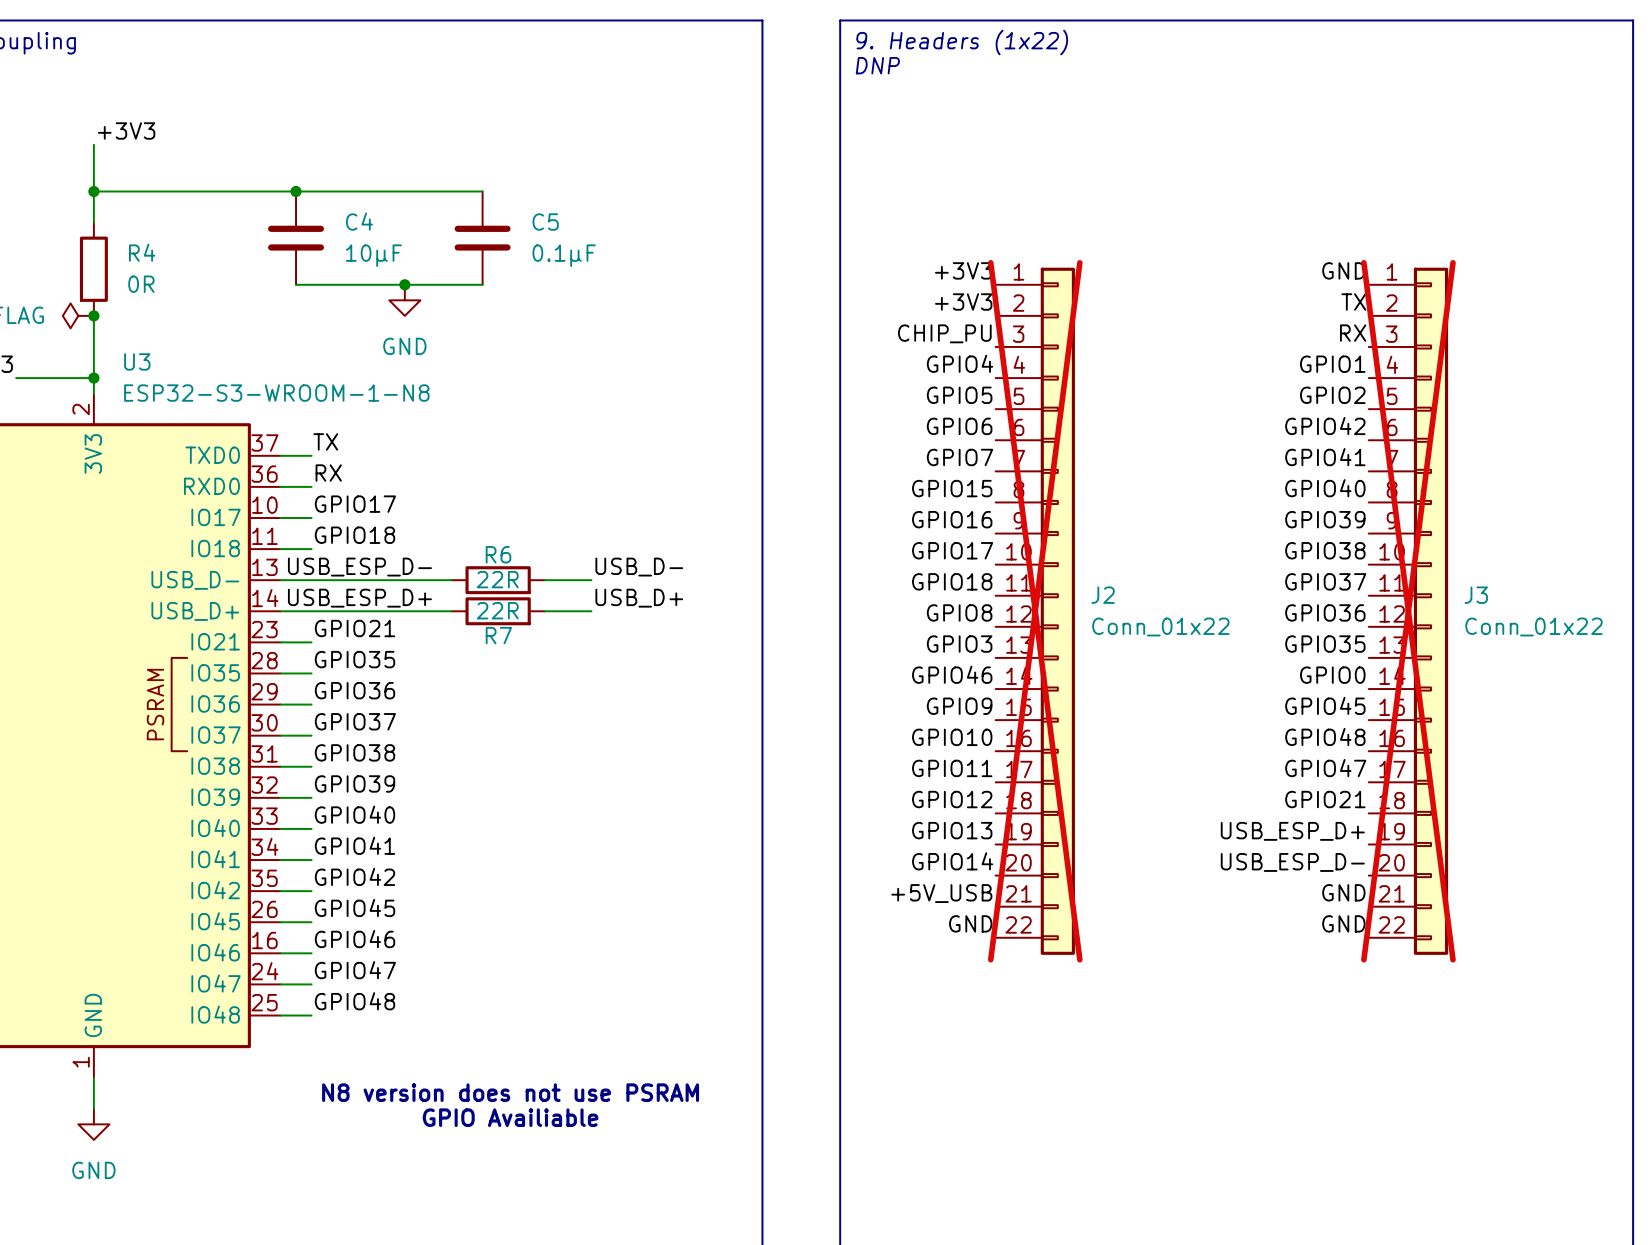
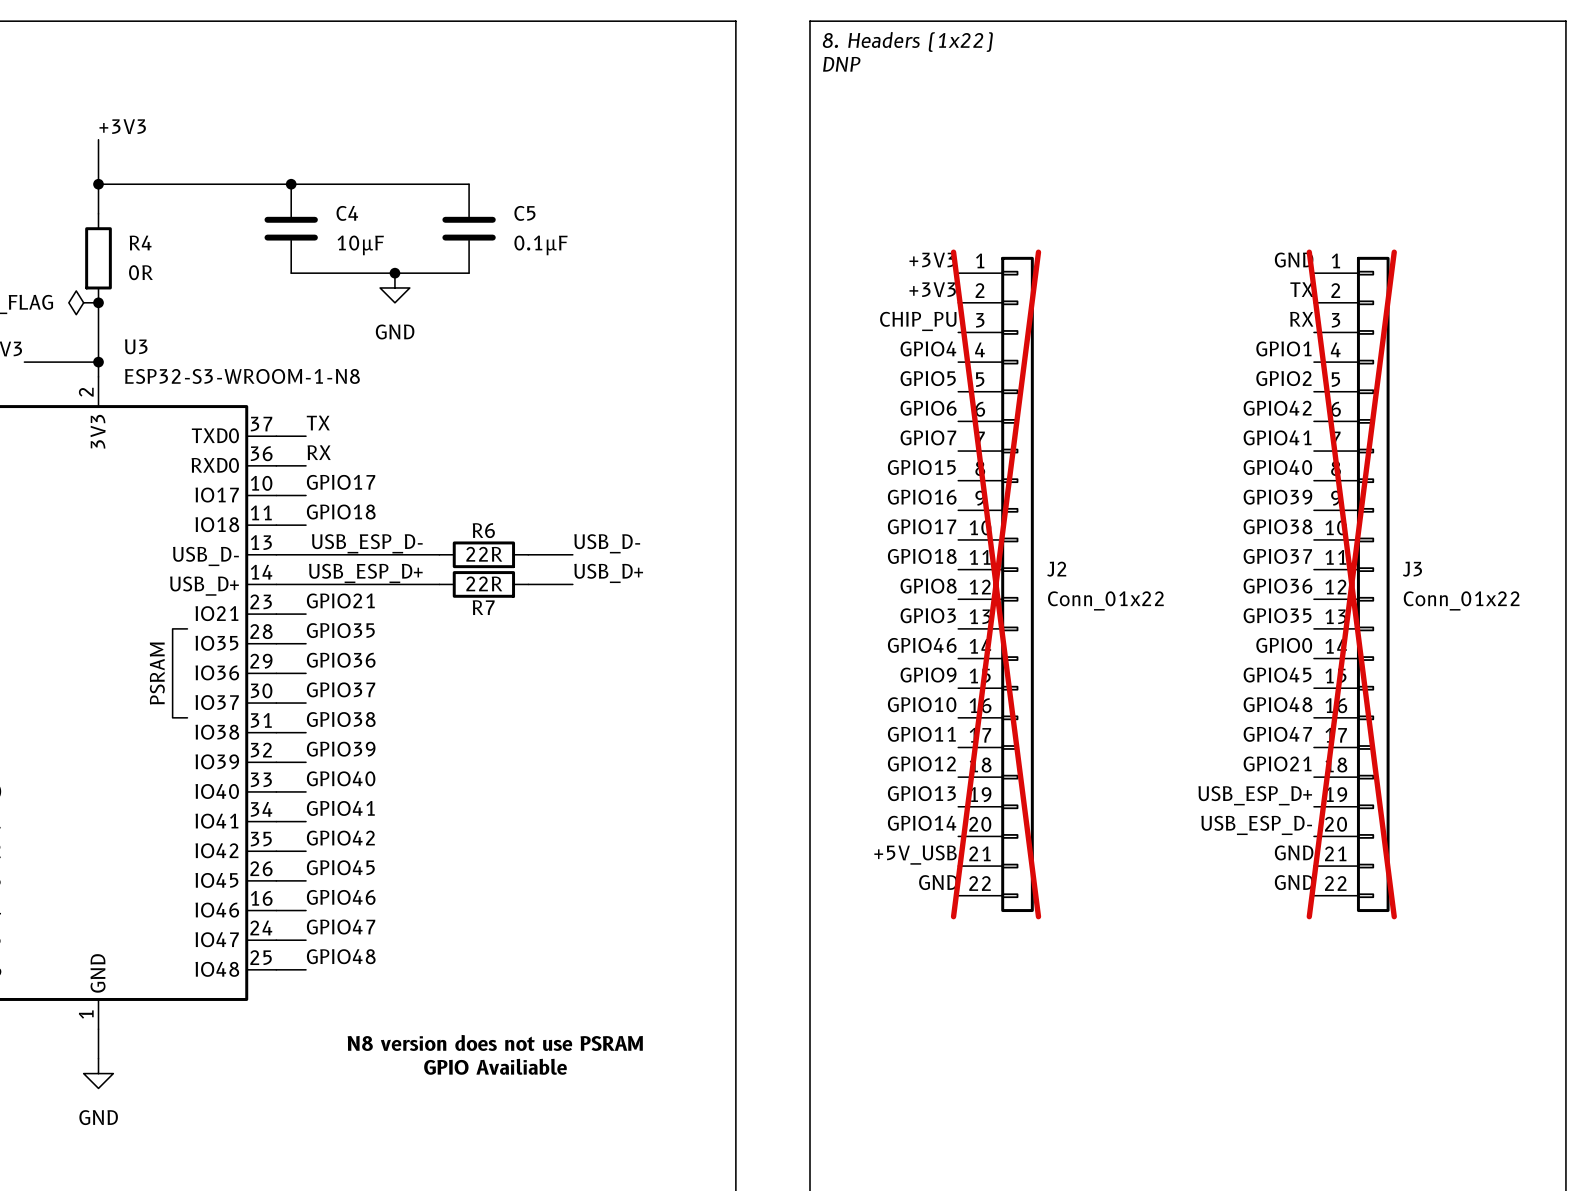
text: 9. Headers (1x22) (962, 42) -> 8. Headers (1x22) (907, 41)

